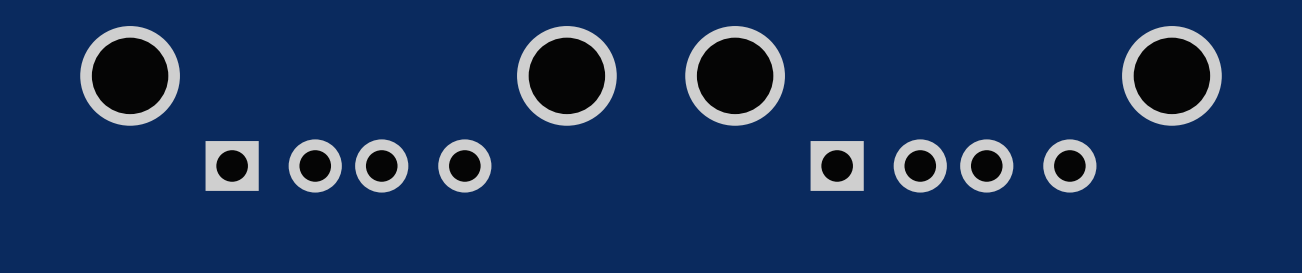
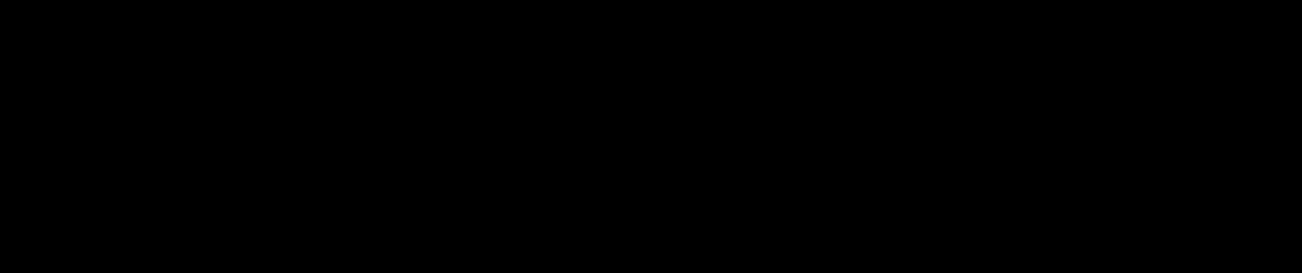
part: (348, 109) -> none
part: (953, 109) -> none

